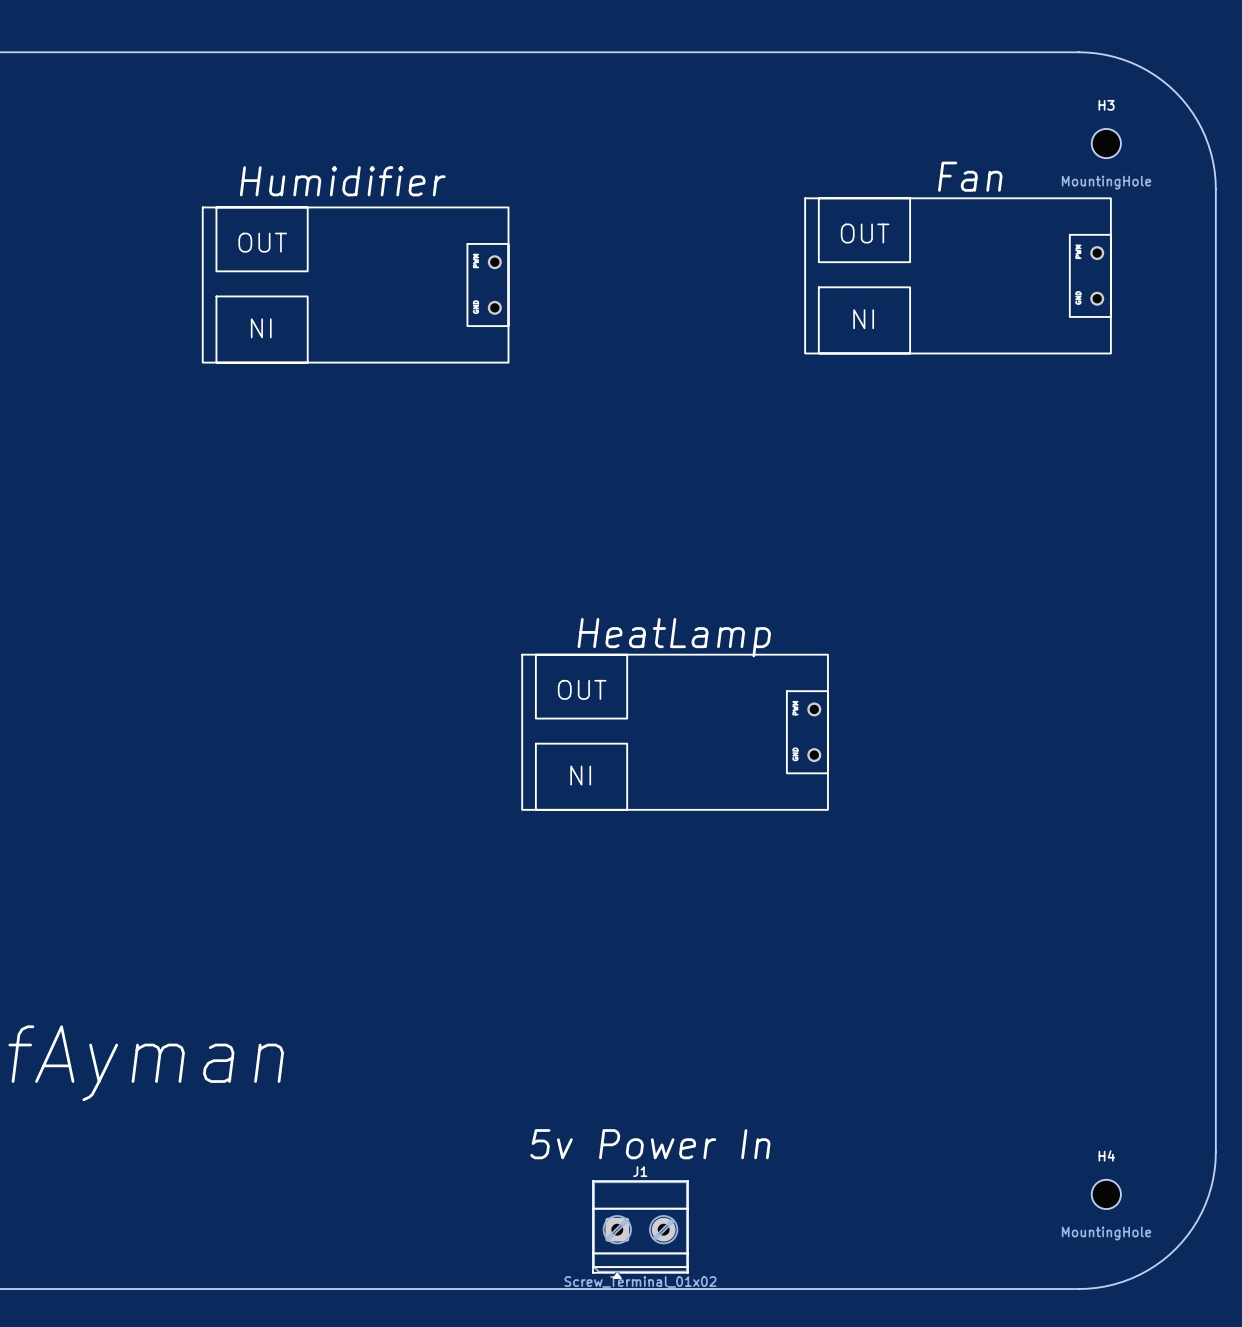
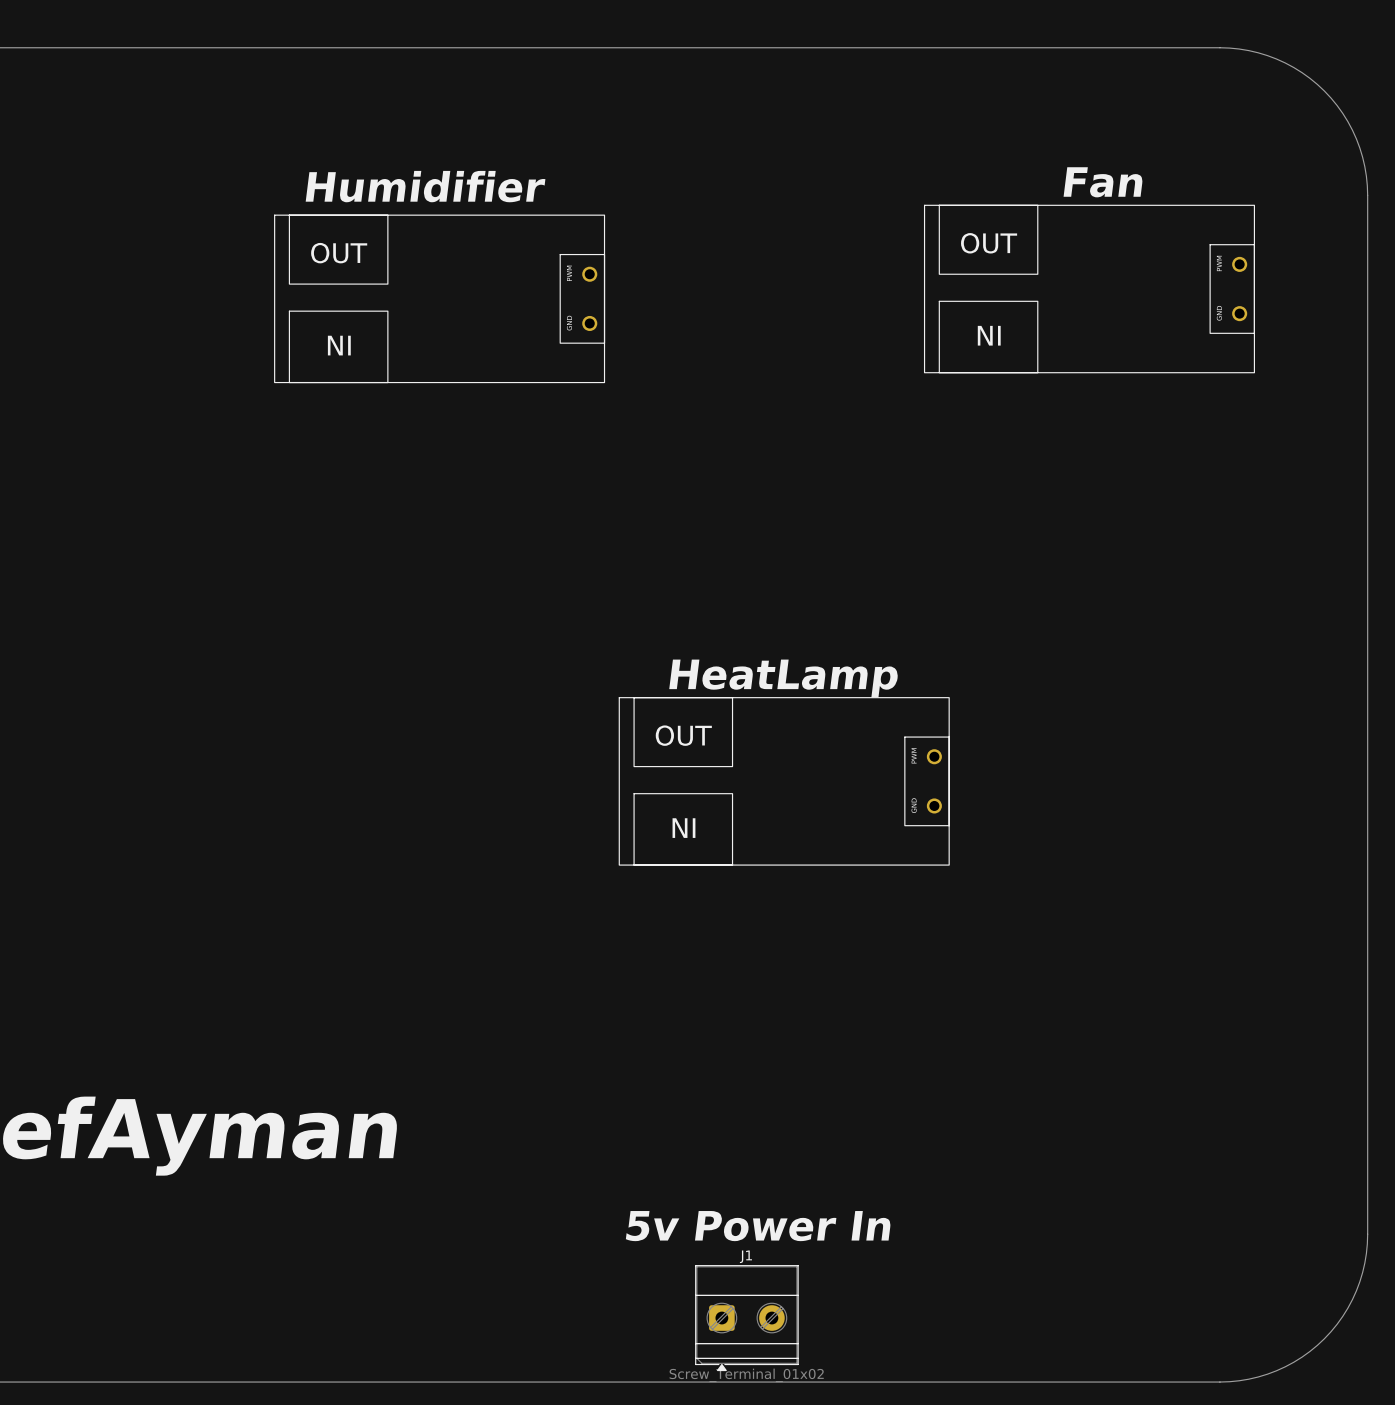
H3: MountingHole (1106, 143) -> none
H4: MountingHole (1106, 1194) -> none

